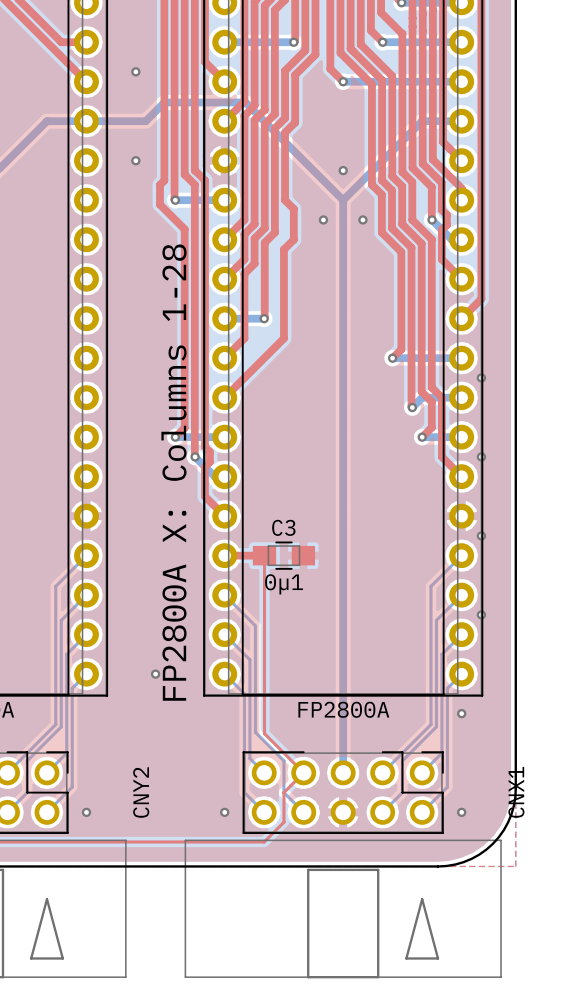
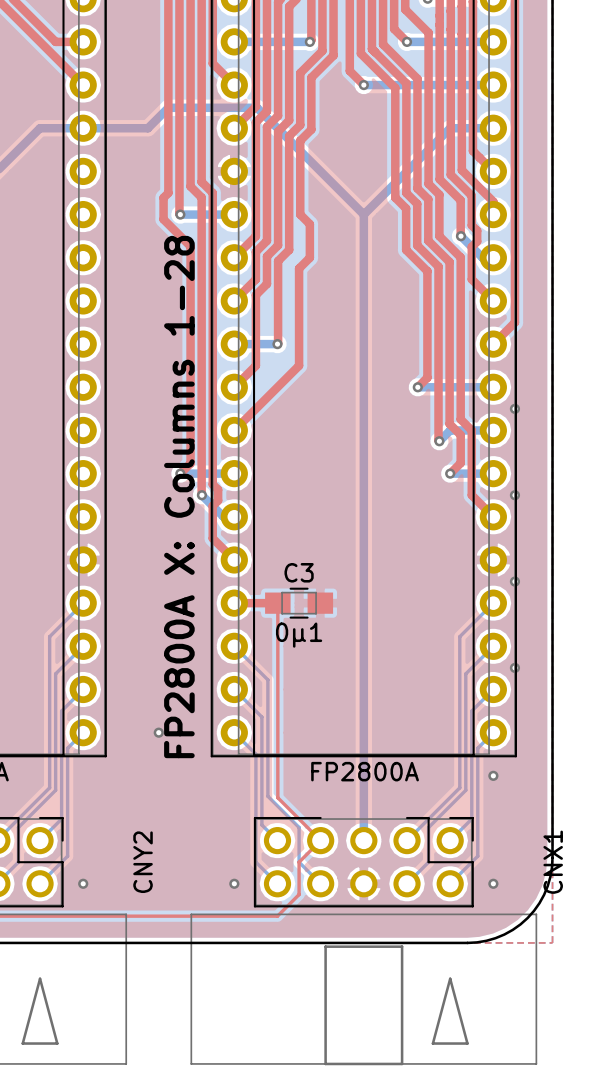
via: (135, 71) -> none
via: (135, 160) -> none
via: (343, 170) -> none
via: (323, 219) -> none
via: (362, 219) -> none

